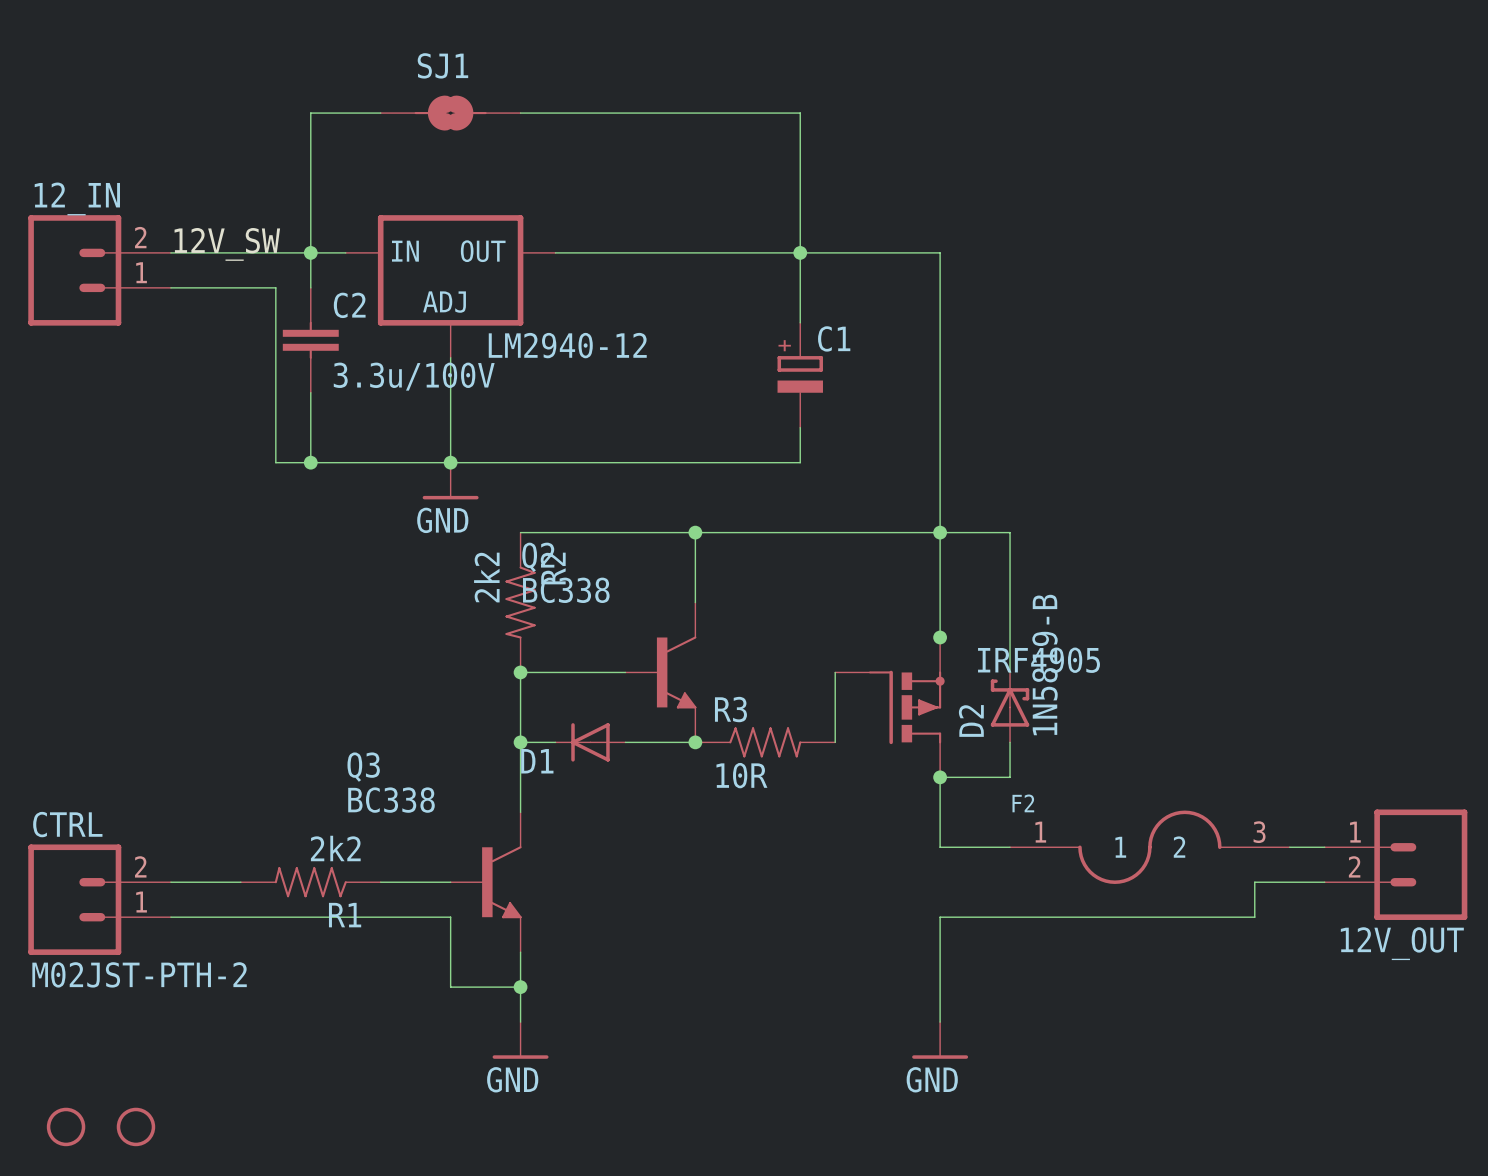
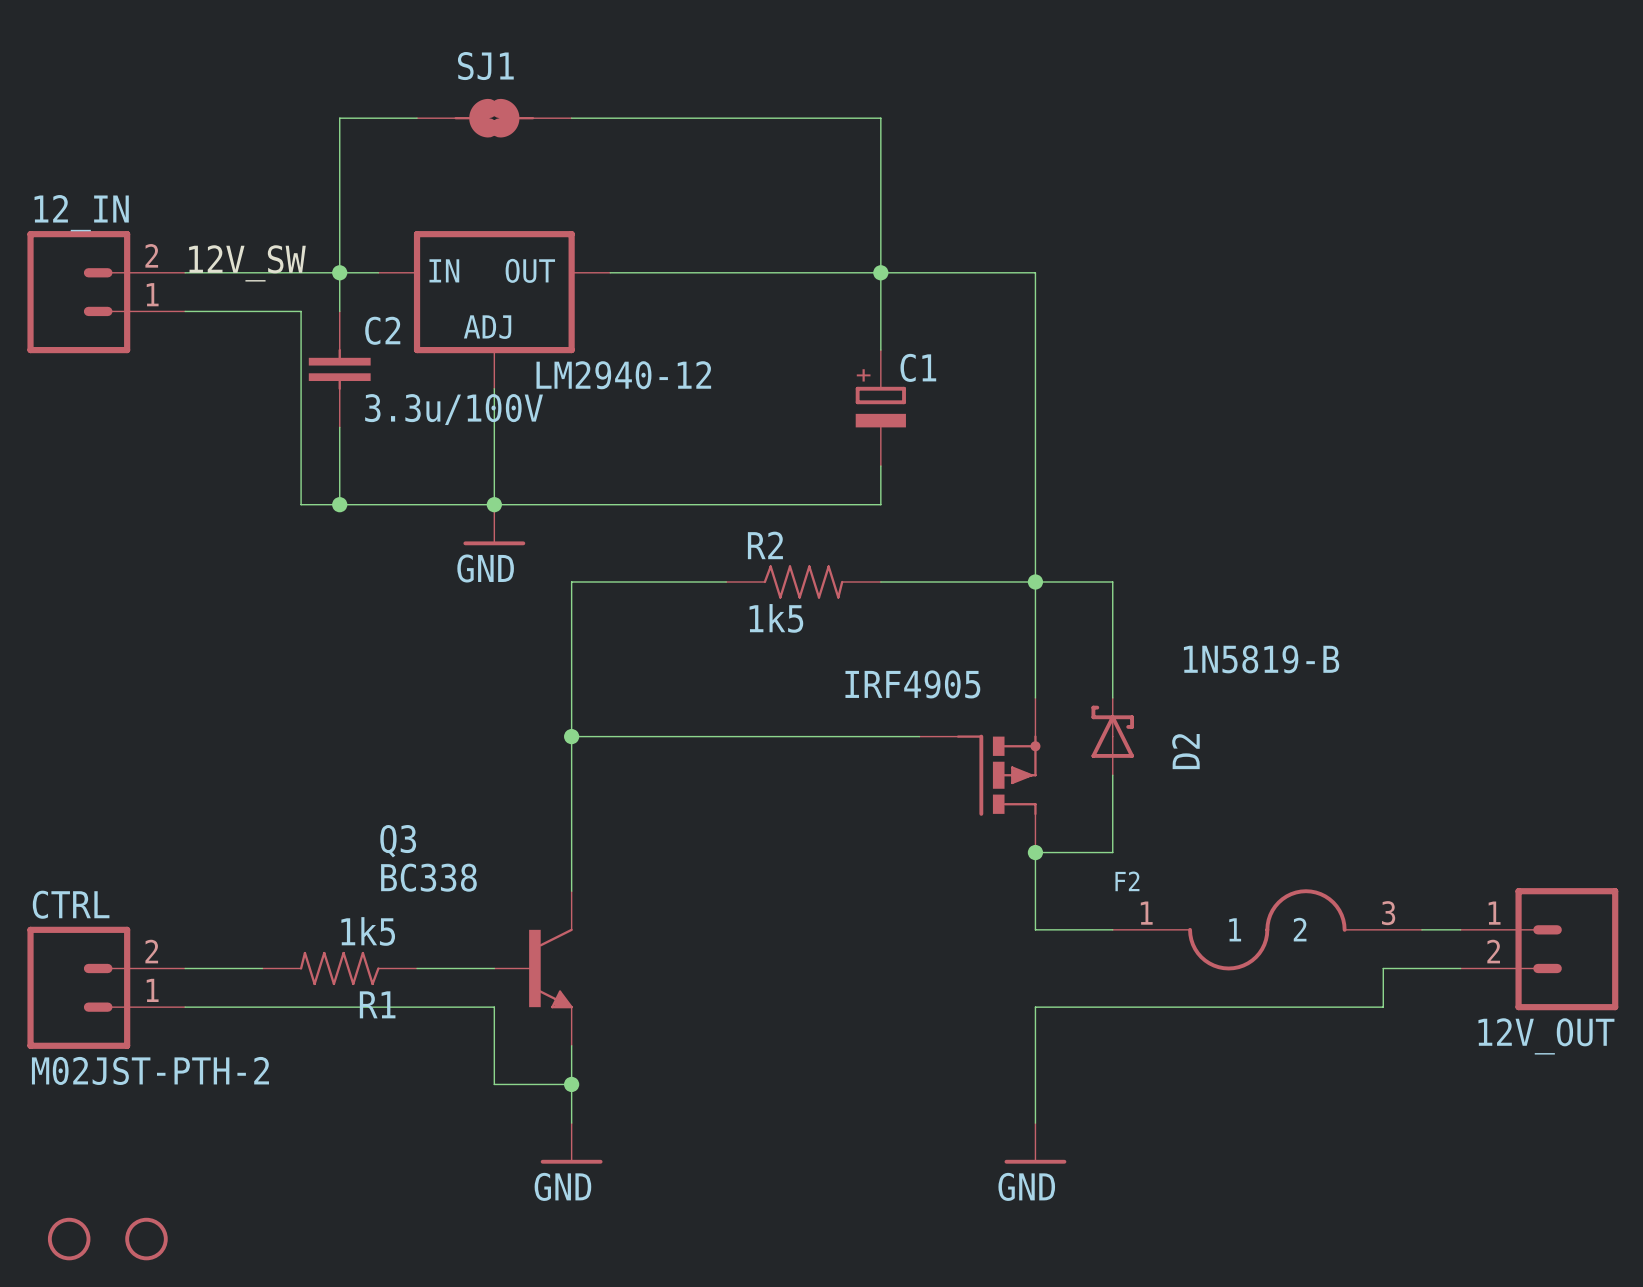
wire: (695, 532) (695, 602) -> none
junction: (695, 532) -> none
R2 value: 2k2 (486, 577) -> 1k5 (776, 618)
R2 rotation: 0° (520, 602) -> 90° counterclockwise (803, 581)
R2 position: (520, 602) -> (803, 581)
junction: (940, 637) -> none
IRF4905 name position: IRF4905 (1039, 660) -> IRF4905 (912, 684)
D2 value rotation: 0° (1045, 665) -> 90° clockwise (1261, 659)
Q2: BC338 (660, 672) -> none
wire: (835, 672) (835, 742) -> (919, 736) (687, 736)
D2 position: (1010, 707) -> (1112, 736)
D2 name position: D2 (971, 720) -> D2 (1185, 751)
wire: (520, 742) (555, 742) -> none
junction: (520, 742) -> none
D1: (590, 742) -> none
wire: (625, 742) (695, 742) -> none
junction: (695, 742) -> none
R3: 10R (765, 742) -> none
R1 value: 2k2 (335, 848) -> 1k5 (368, 931)

